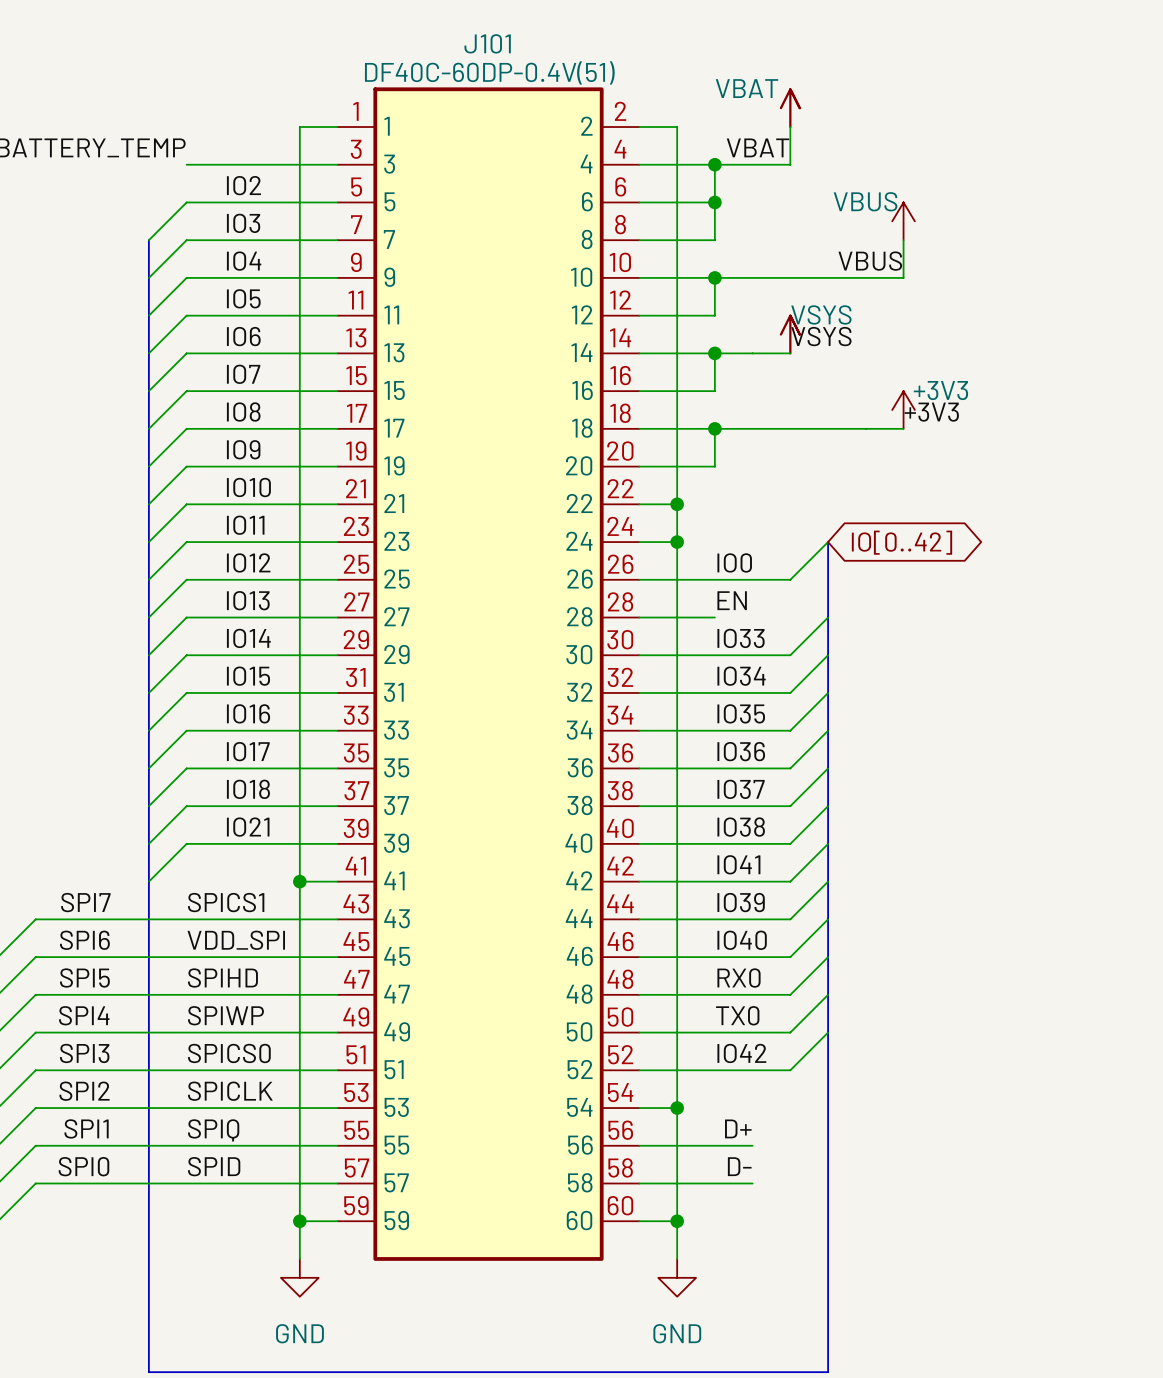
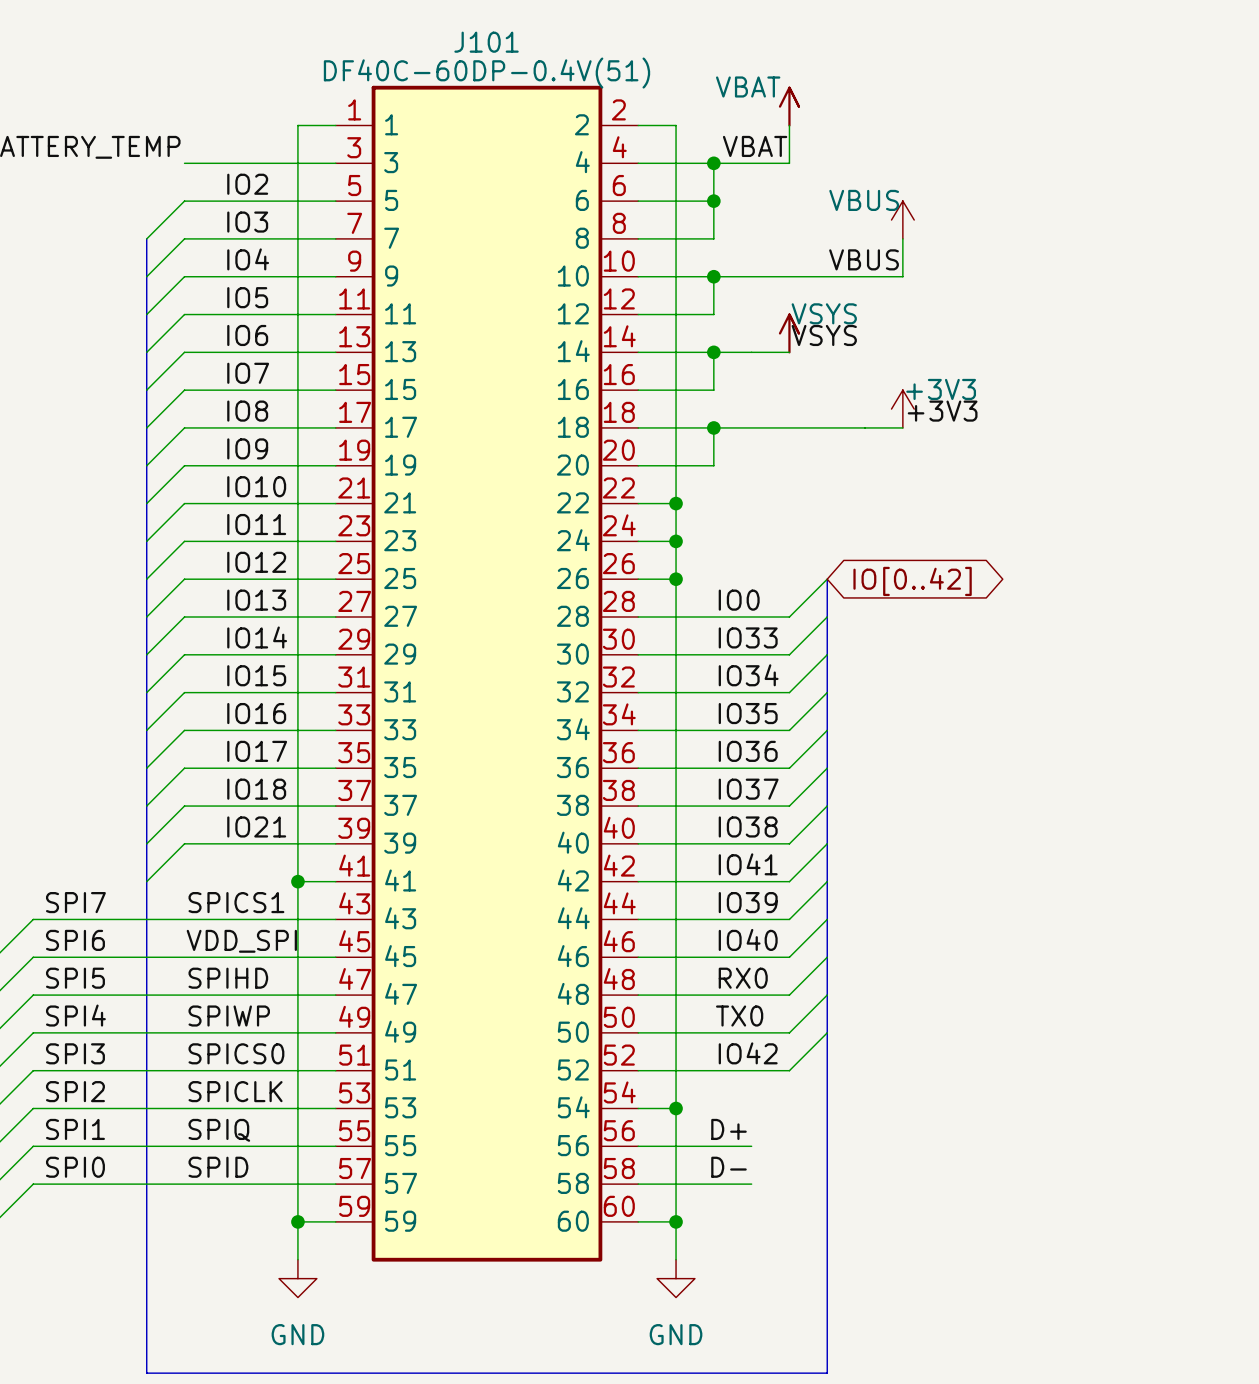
wire: (828, 542) (790, 579) (677, 579) -> none
bus: (828, 542) (828, 579) -> none
global label position: IO[0..42] (902, 542) -> IO[0..42] (912, 581)
label: IO0 (734, 562) -> none
junction: none -> (676, 579)
wire: none -> (827, 579) (789, 617) (713, 617)
label: EN (732, 600) -> IO0 (739, 600)

